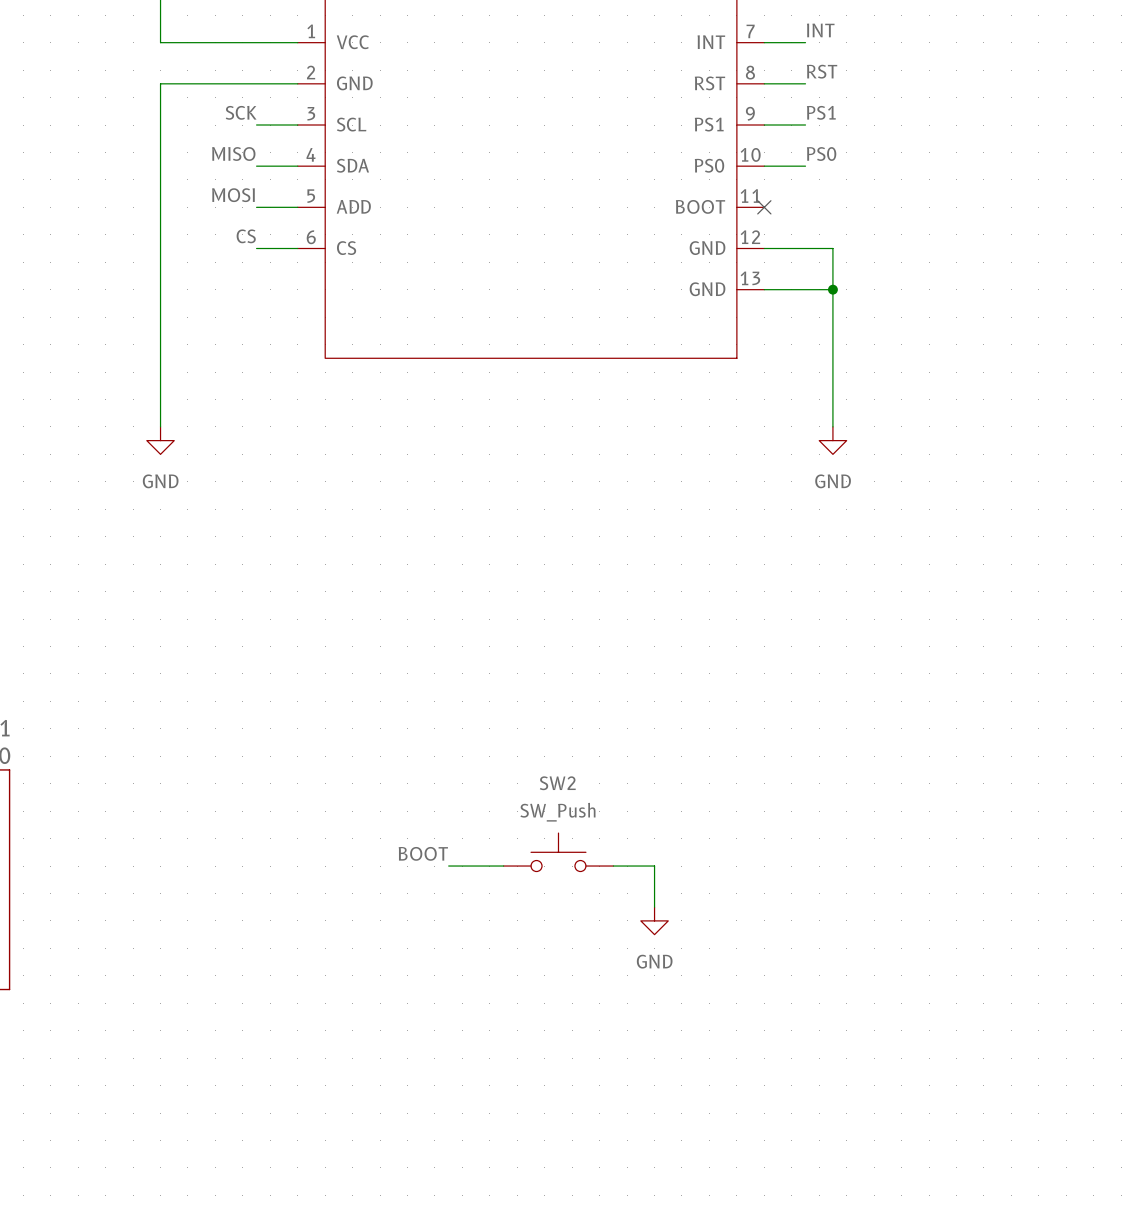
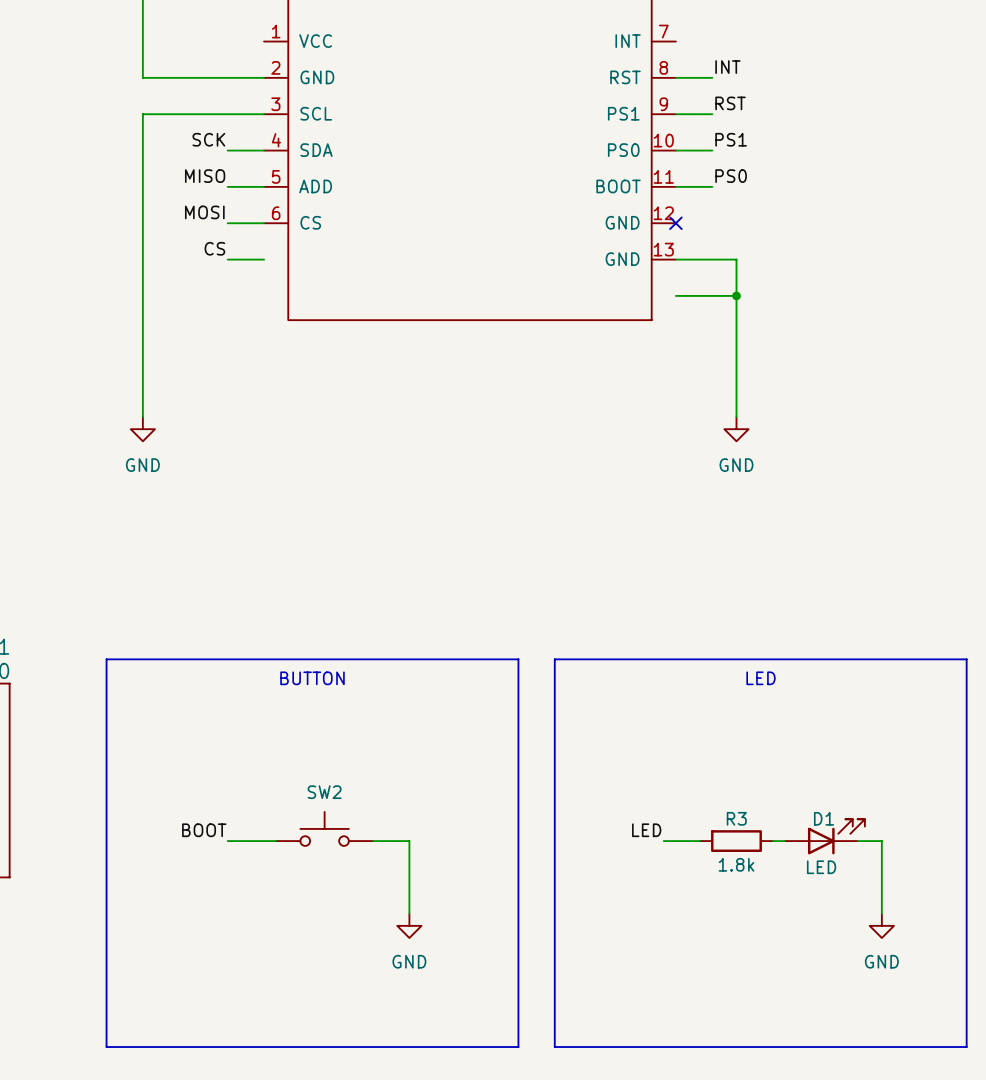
label: INT (820, 30) -> none
wire: (160, 42) (297, 42) -> none
wire: (764, 42) (805, 42) -> (675, 186) (712, 186)
label: RST (822, 71) -> INT (727, 67)
wire: (160, 83) (160, 125) -> (142, 77) (142, 41)
label: SCK (241, 112) -> none
label: PS1 (821, 112) -> RST (730, 103)
wire: none -> (142, 114) (227, 114)
label: MISO (233, 153) -> SCK (208, 139)
label: PS0 (821, 154) -> PS1 (731, 139)
label: MOSI (233, 195) -> MISO (205, 176)
label: none -> PS0 (731, 176)
no-connect mark position: (764, 207) -> (675, 223)
label: CS (246, 236) -> MOSI (204, 212)
wire: (764, 248) (832, 248) (832, 289) -> none
label: none -> CS (214, 248)
wire: none -> (227, 259) (264, 259)
junction position: (832, 289) -> (736, 295)
wire: none -> (675, 295) (736, 295)
wire: none -> (142, 380) (142, 417)
wire: none -> (736, 380) (736, 417)
power symbol position: GND (160, 440) -> GND (142, 429)
power symbol position: GND (832, 440) -> GND (736, 429)
line: none -> (106, 659) (518, 659) (518, 1047) (106, 1047) (106, 659)
line: none -> (554, 659) (966, 659) (966, 1047) (554, 1047) (554, 659)
text: none -> BUTTON (312, 678)
text: none -> LED (761, 678)
SW2 name position: SW2 (557, 783) -> SW2 (324, 792)
SW2 value: SW_Push (557, 812) -> none
SW2 position: (558, 852) -> (324, 828)
label position: BOOT (423, 853) -> BOOT (204, 830)
wire: (448, 866) (503, 866) -> (227, 841) (276, 841)
wire: (613, 866) (654, 866) (654, 907) -> none
power symbol: GND (654, 920) -> none
label: none -> LED (646, 830)
D1: none -> LED (824, 836)
wire: none -> (373, 841) (409, 841) (409, 913)
wire: none -> (663, 841) (700, 841)
R3: none -> 1.8k (736, 841)
wire: none -> (772, 841) (784, 841)
wire: none -> (857, 841) (881, 841) (881, 913)
power symbol: none -> GND (409, 925)
power symbol: none -> GND (881, 925)

